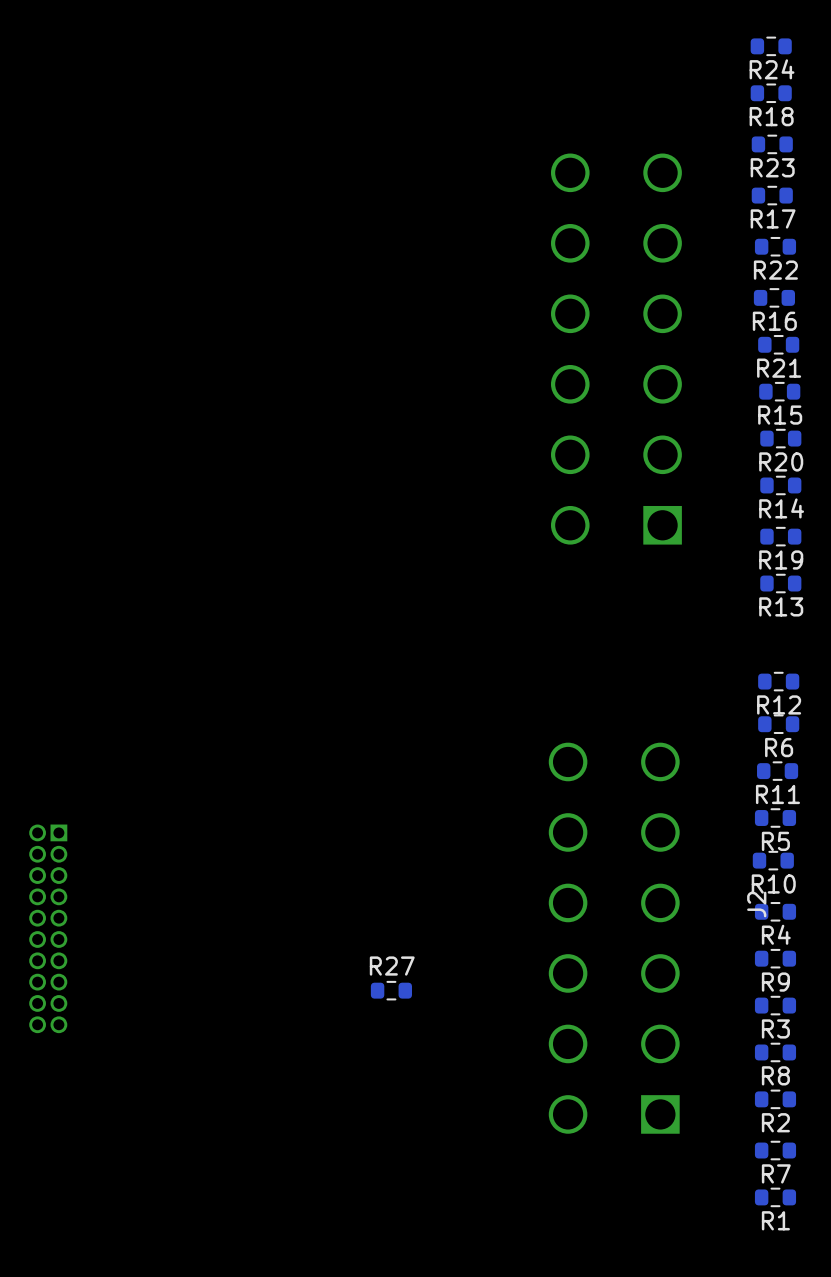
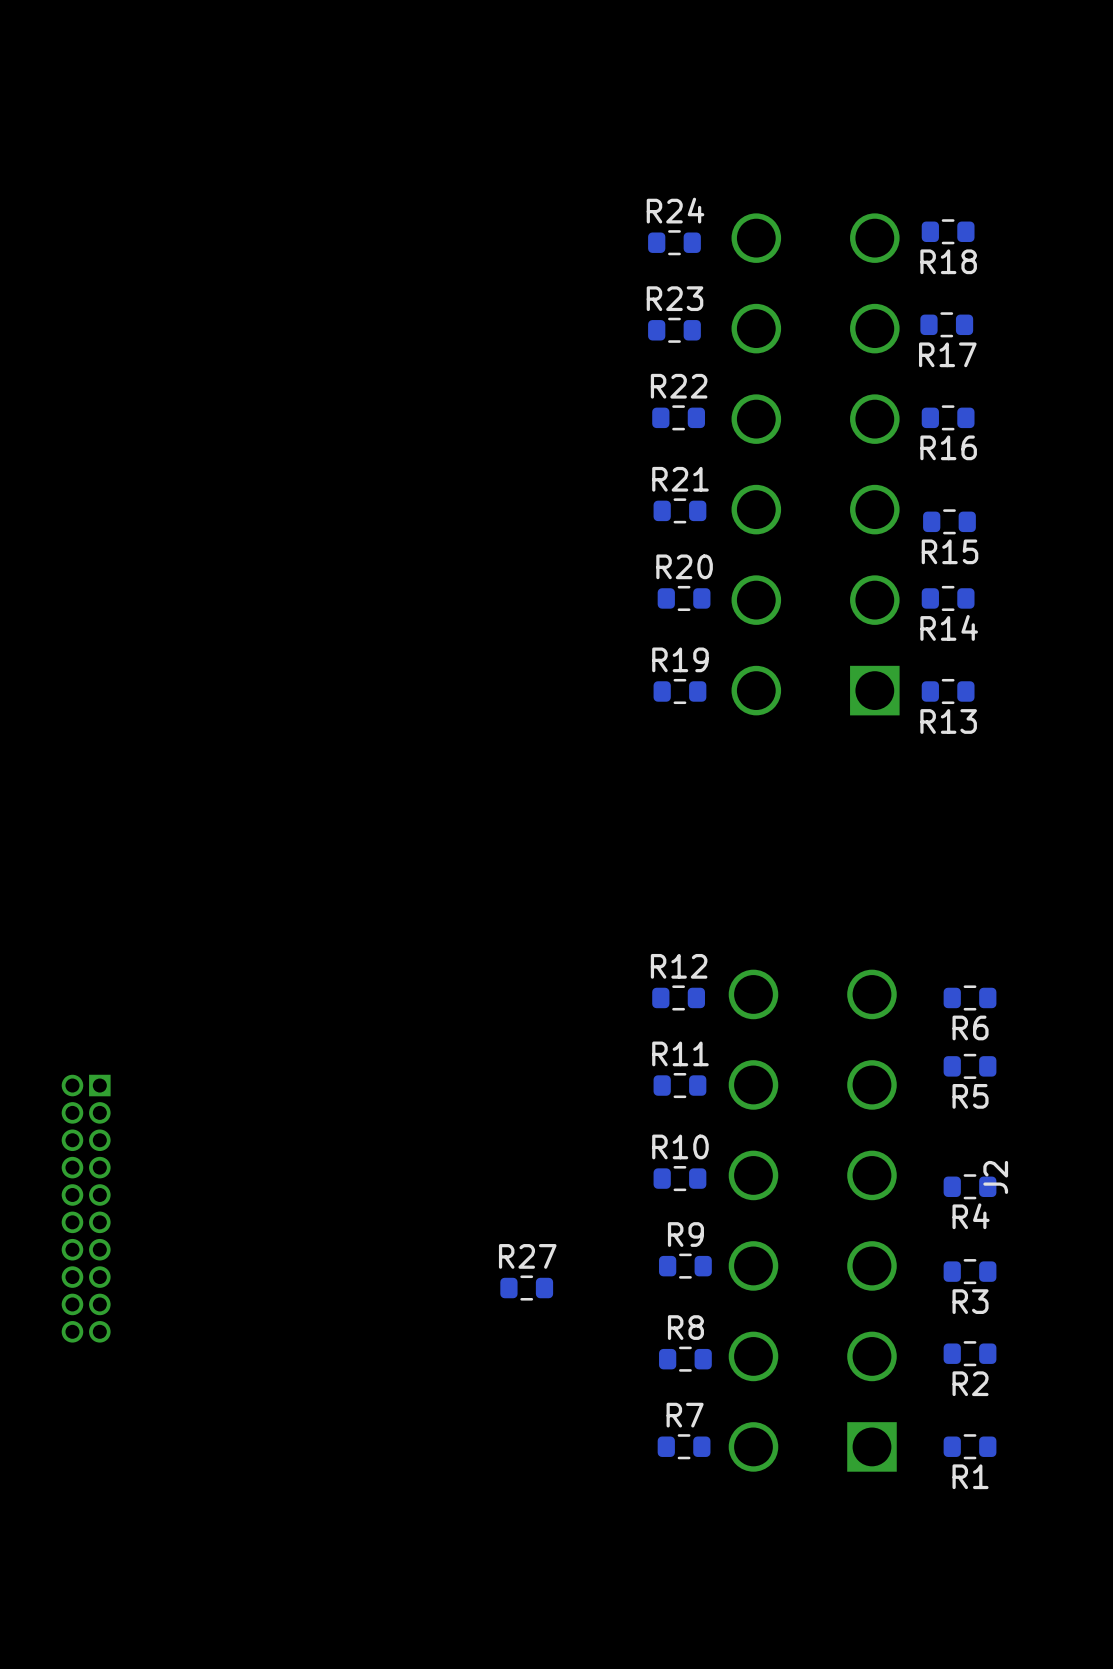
R24 position: (771, 46) -> (674, 242)
R24 name position: R24 (772, 69) -> R24 (675, 210)
R18 position: (771, 93) -> (948, 231)
R23 position: (772, 144) -> (674, 330)
R23 name position: R23 (772, 167) -> R23 (674, 298)
R17 position: (772, 195) -> (946, 324)
R22 position: (775, 246) -> (678, 417)
R22 name position: R22 (775, 270) -> R22 (679, 386)
R16 position: (774, 297) -> (948, 417)
R21 position: (778, 344) -> (679, 510)
R21 name position: R21 (779, 368) -> R21 (680, 479)
R15 position: (779, 391) -> (949, 521)
R20 position: (780, 438) -> (684, 598)
R20 name position: R20 (781, 461) -> R20 (684, 566)
R14 position: (780, 485) -> (948, 598)
R19 position: (780, 536) -> (679, 691)
R19 name position: R19 (781, 560) -> R19 (680, 659)
R13 position: (780, 583) -> (948, 691)
R12 position: (778, 681) -> (678, 997)
R12 name position: R12 (779, 704) -> R12 (679, 966)
R6 position: (778, 724) -> (970, 997)
R11 position: (777, 771) -> (679, 1085)
R11 name position: R11 (777, 794) -> R11 (680, 1053)
R5 position: (775, 818) -> (970, 1066)
R10 position: (773, 860) -> (679, 1178)
R10 name position: R10 (773, 884) -> R10 (680, 1146)
R4 position: (775, 911) -> (970, 1186)
R9 position: (775, 958) -> (685, 1266)
R9 name position: R9 (775, 982) -> R9 (685, 1234)
R3 position: (775, 1005) -> (970, 1271)
R8 position: (775, 1052) -> (685, 1359)
R8 name position: R8 (775, 1075) -> R8 (685, 1327)
R2 position: (775, 1099) -> (970, 1353)
R7 position: (775, 1150) -> (684, 1446)
R7 name position: R7 (776, 1173) -> R7 (685, 1415)
R1 position: (775, 1197) -> (970, 1446)

